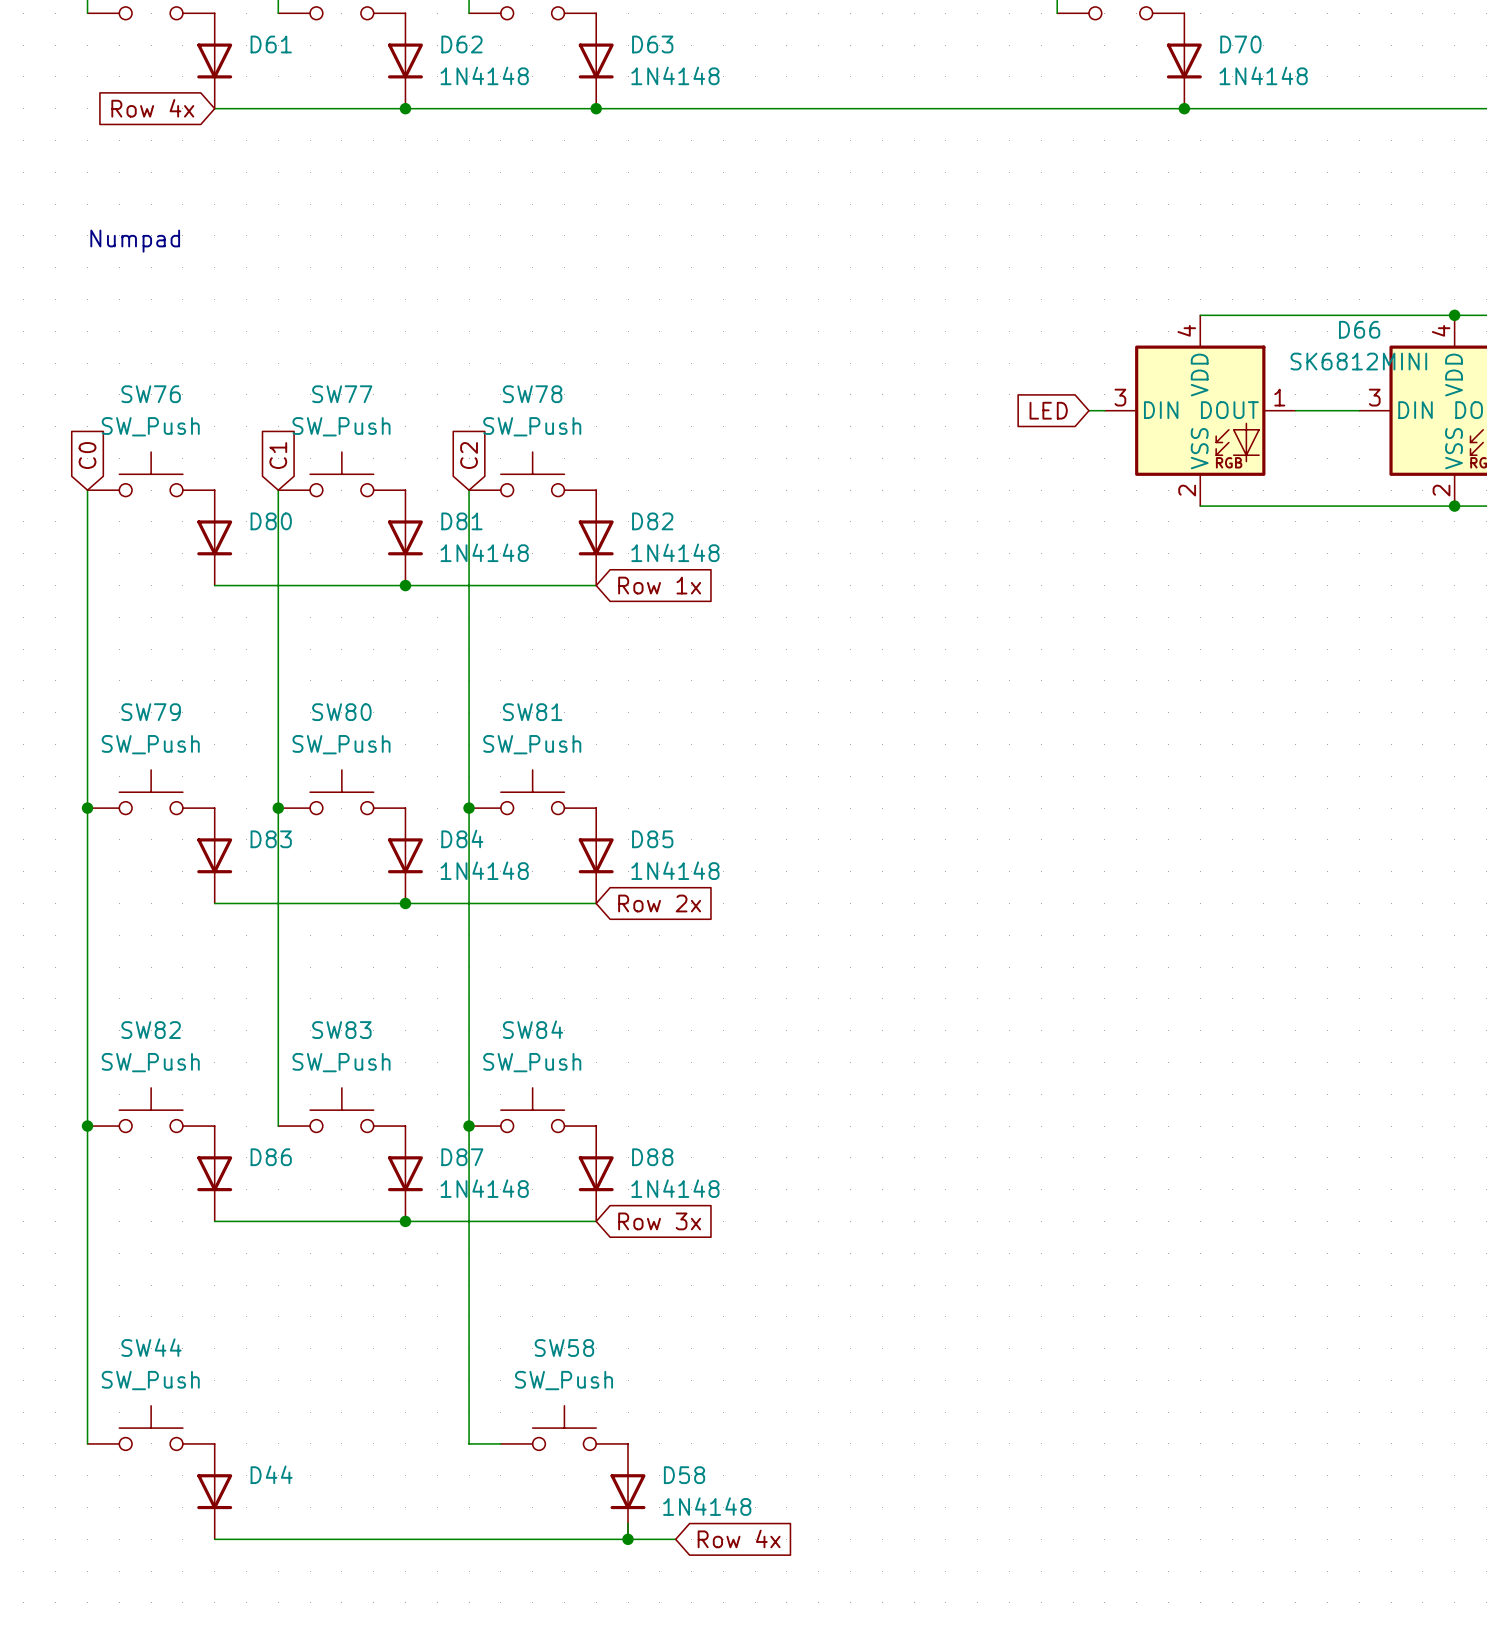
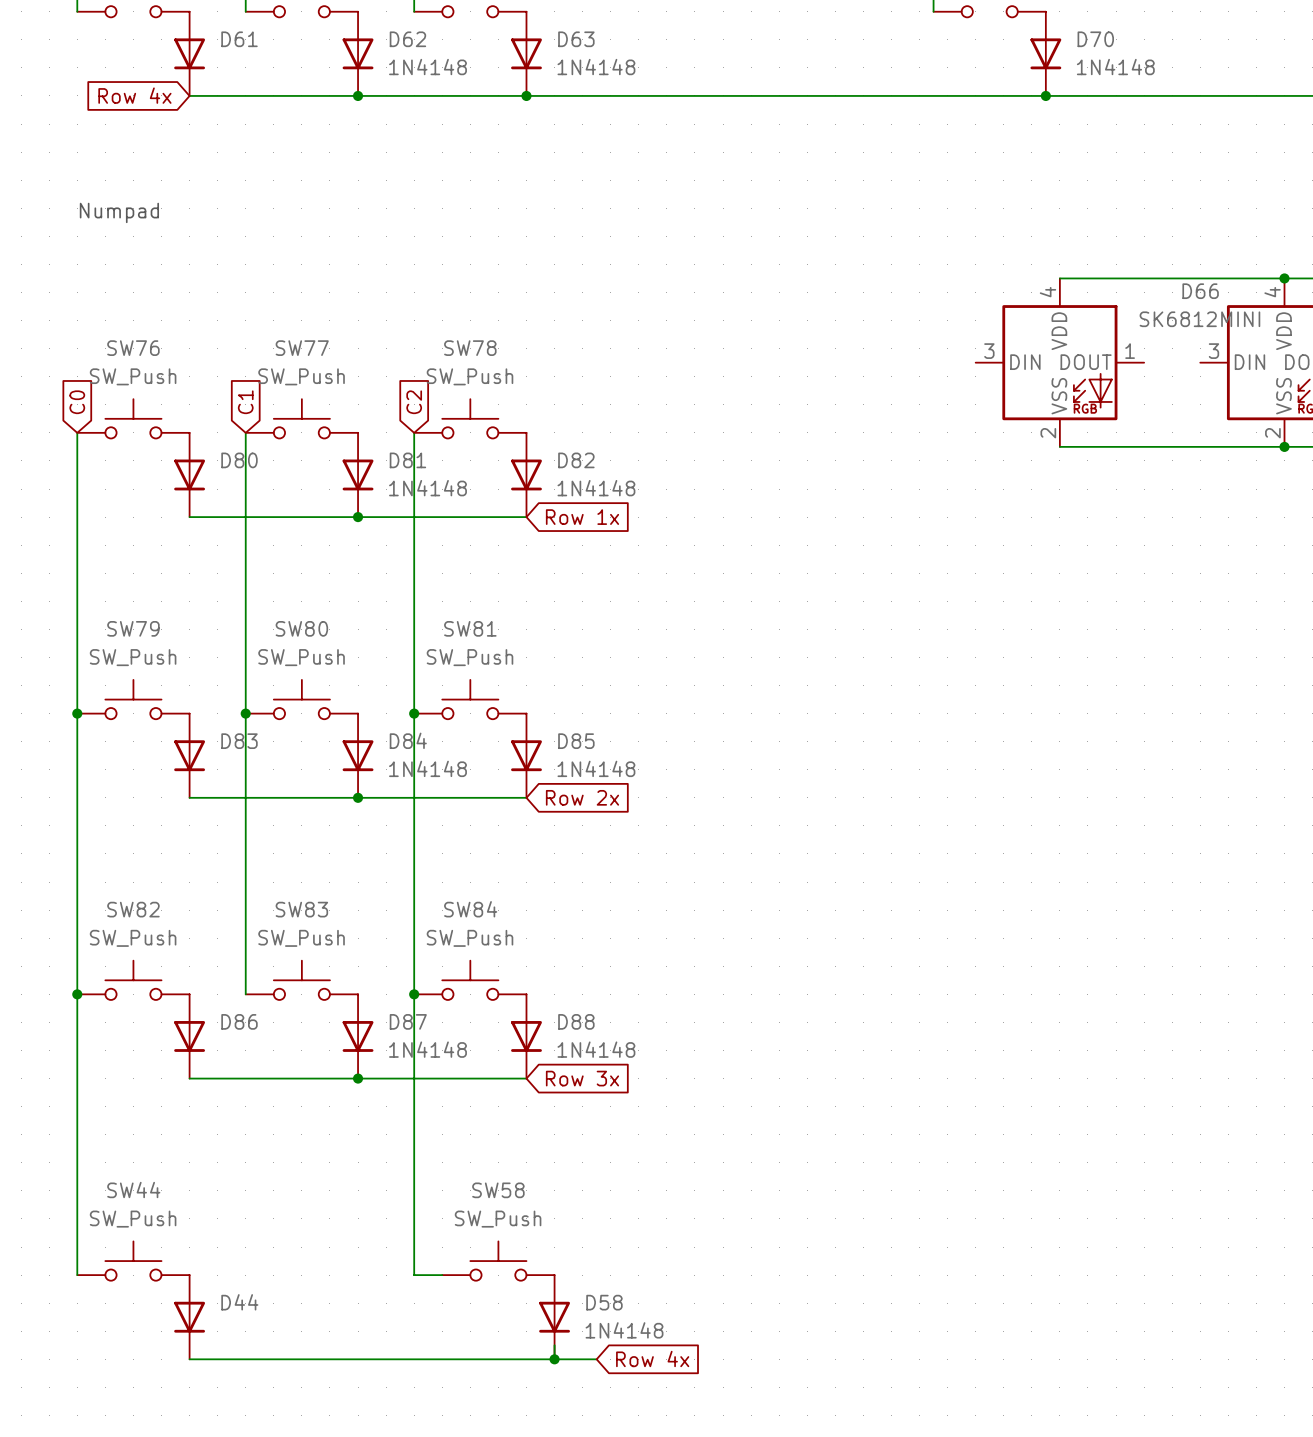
global label: LED (1048, 410) -> none
wire: (1089, 410) (1104, 410) -> none
wire: (1295, 410) (1359, 410) -> none

